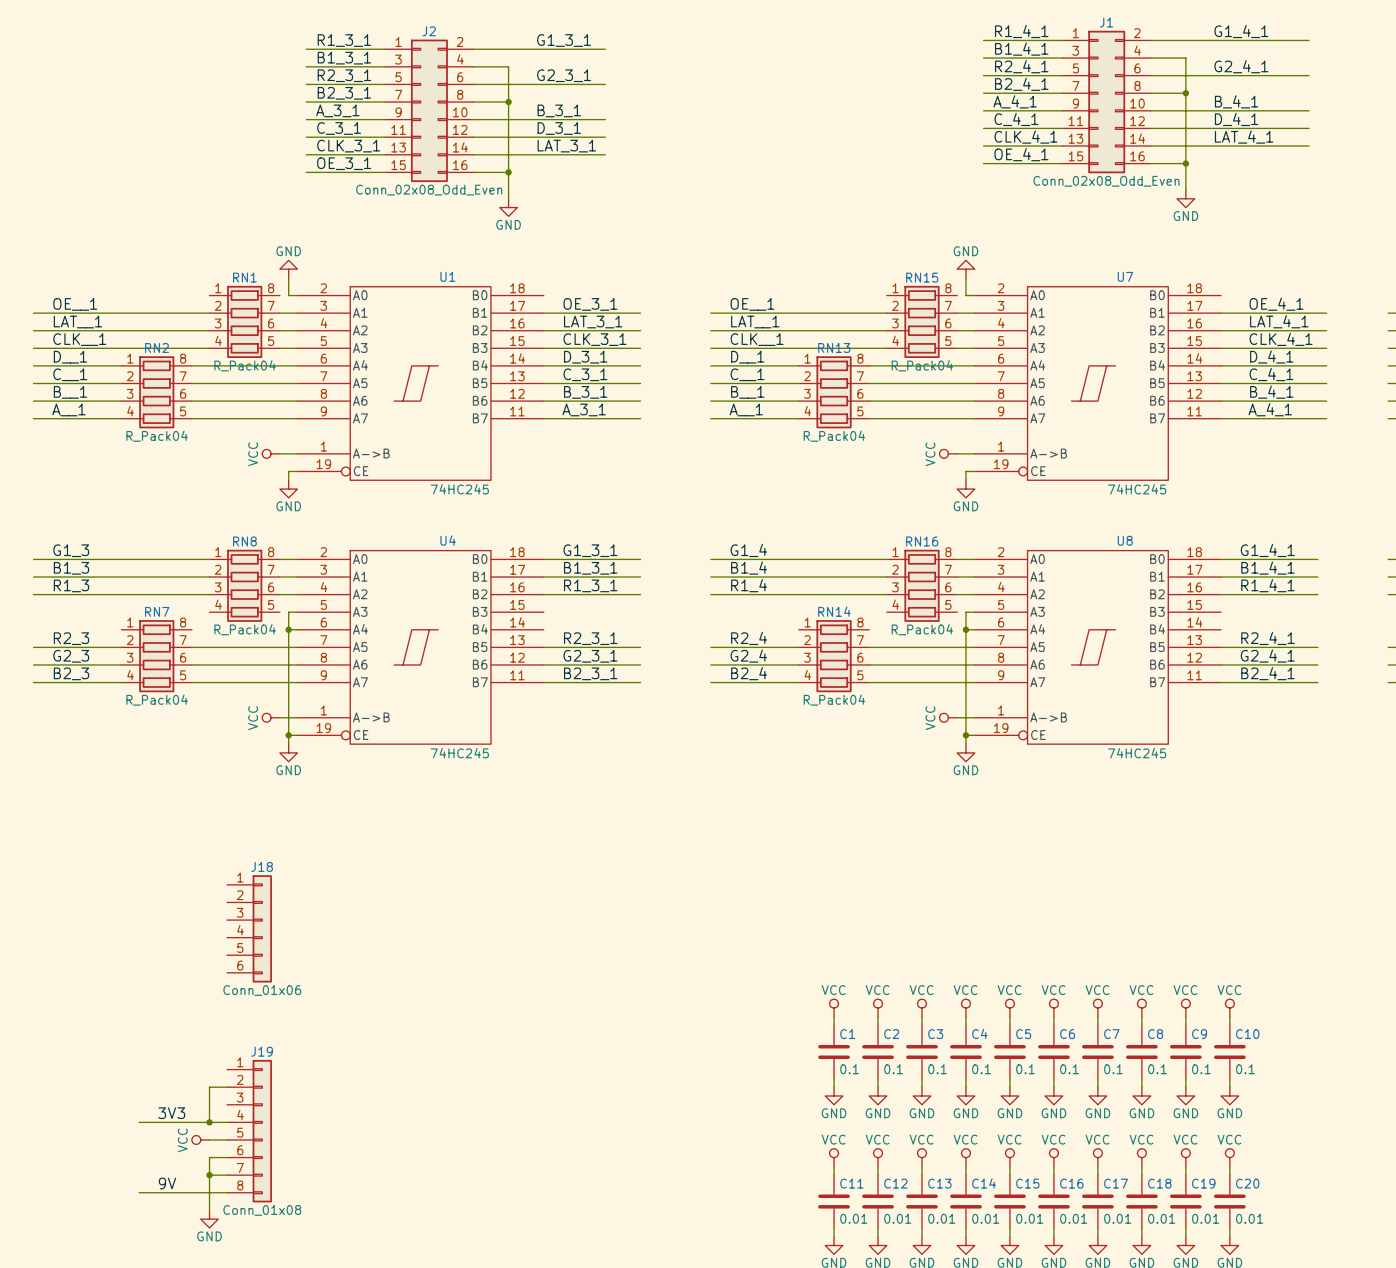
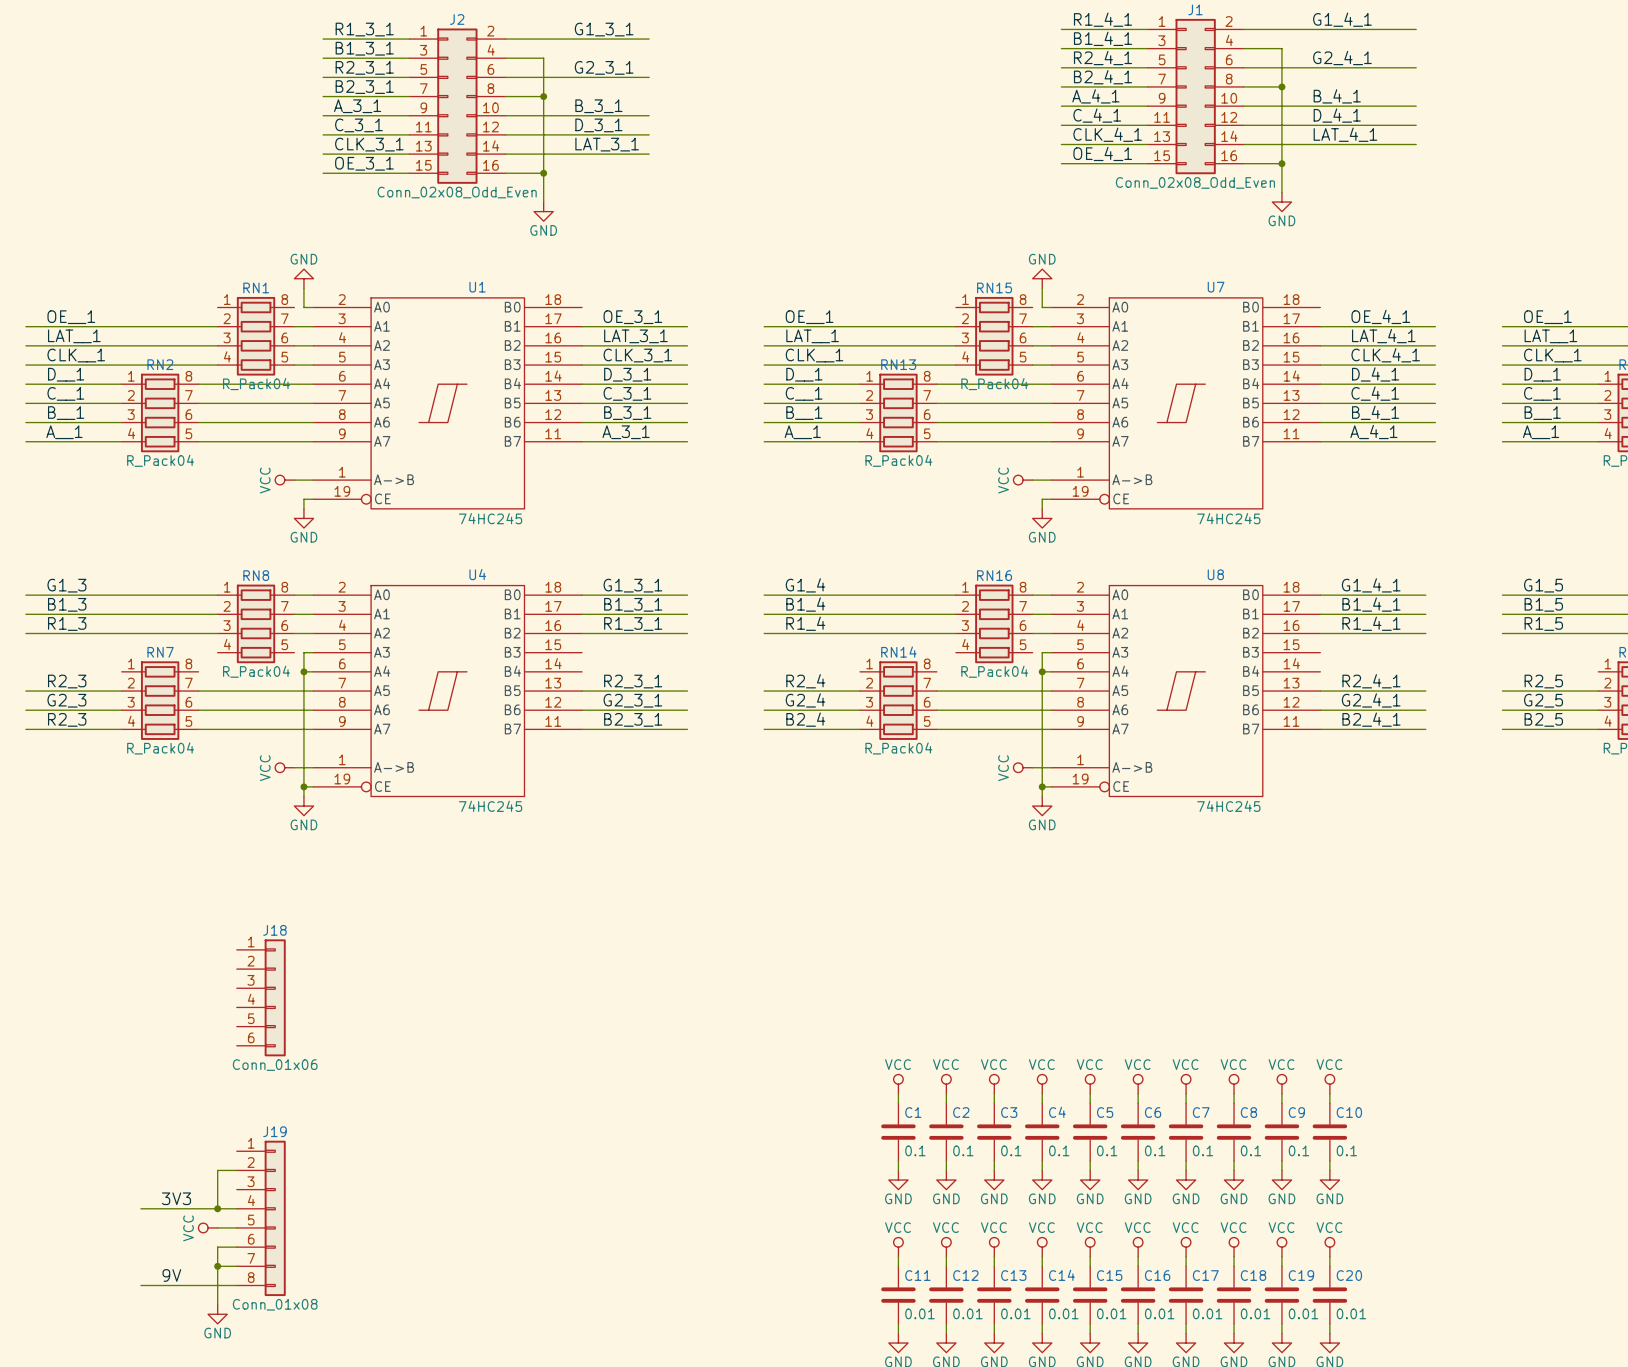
label: B2_3 (71, 673) -> R2_3 (67, 719)

